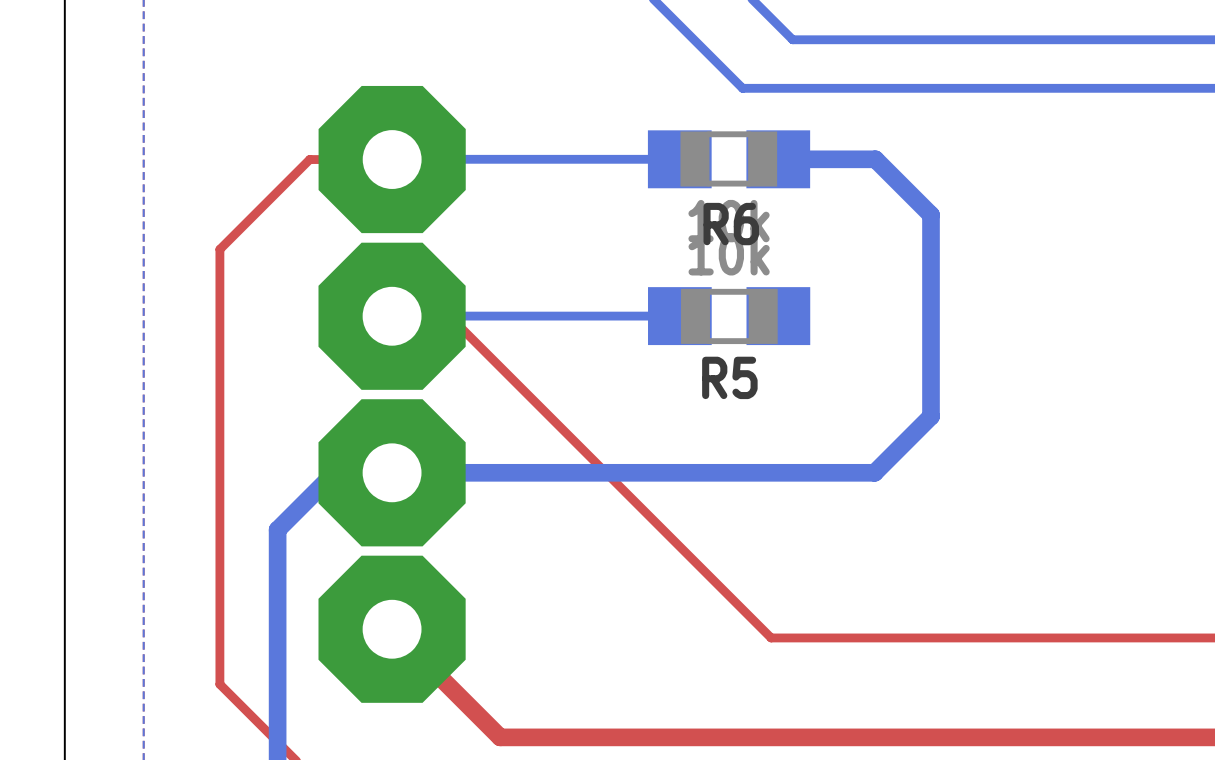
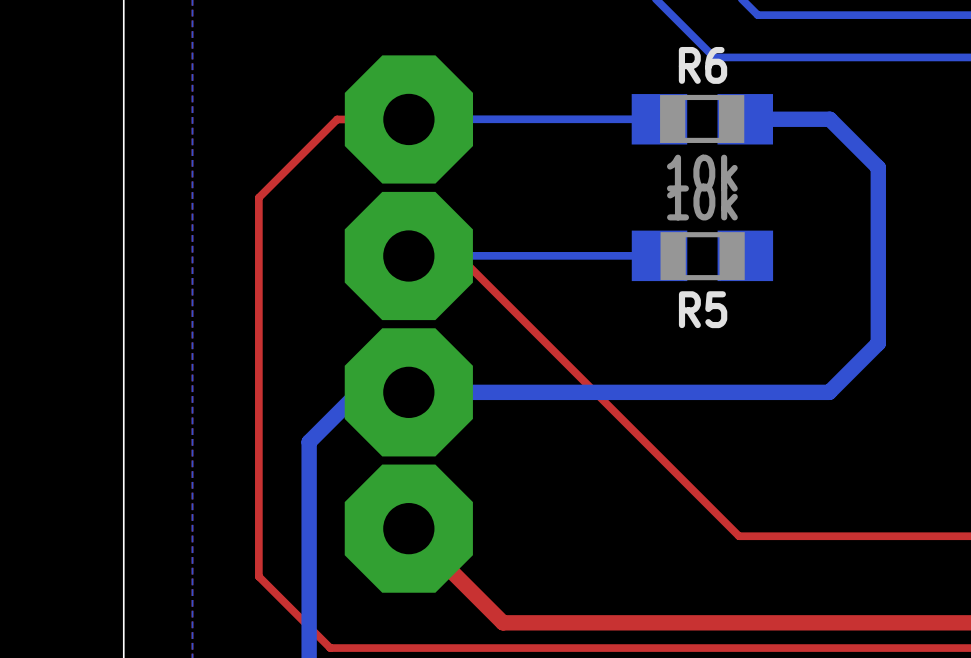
R6 name position: R6 (731, 224) -> R6 (703, 65)

